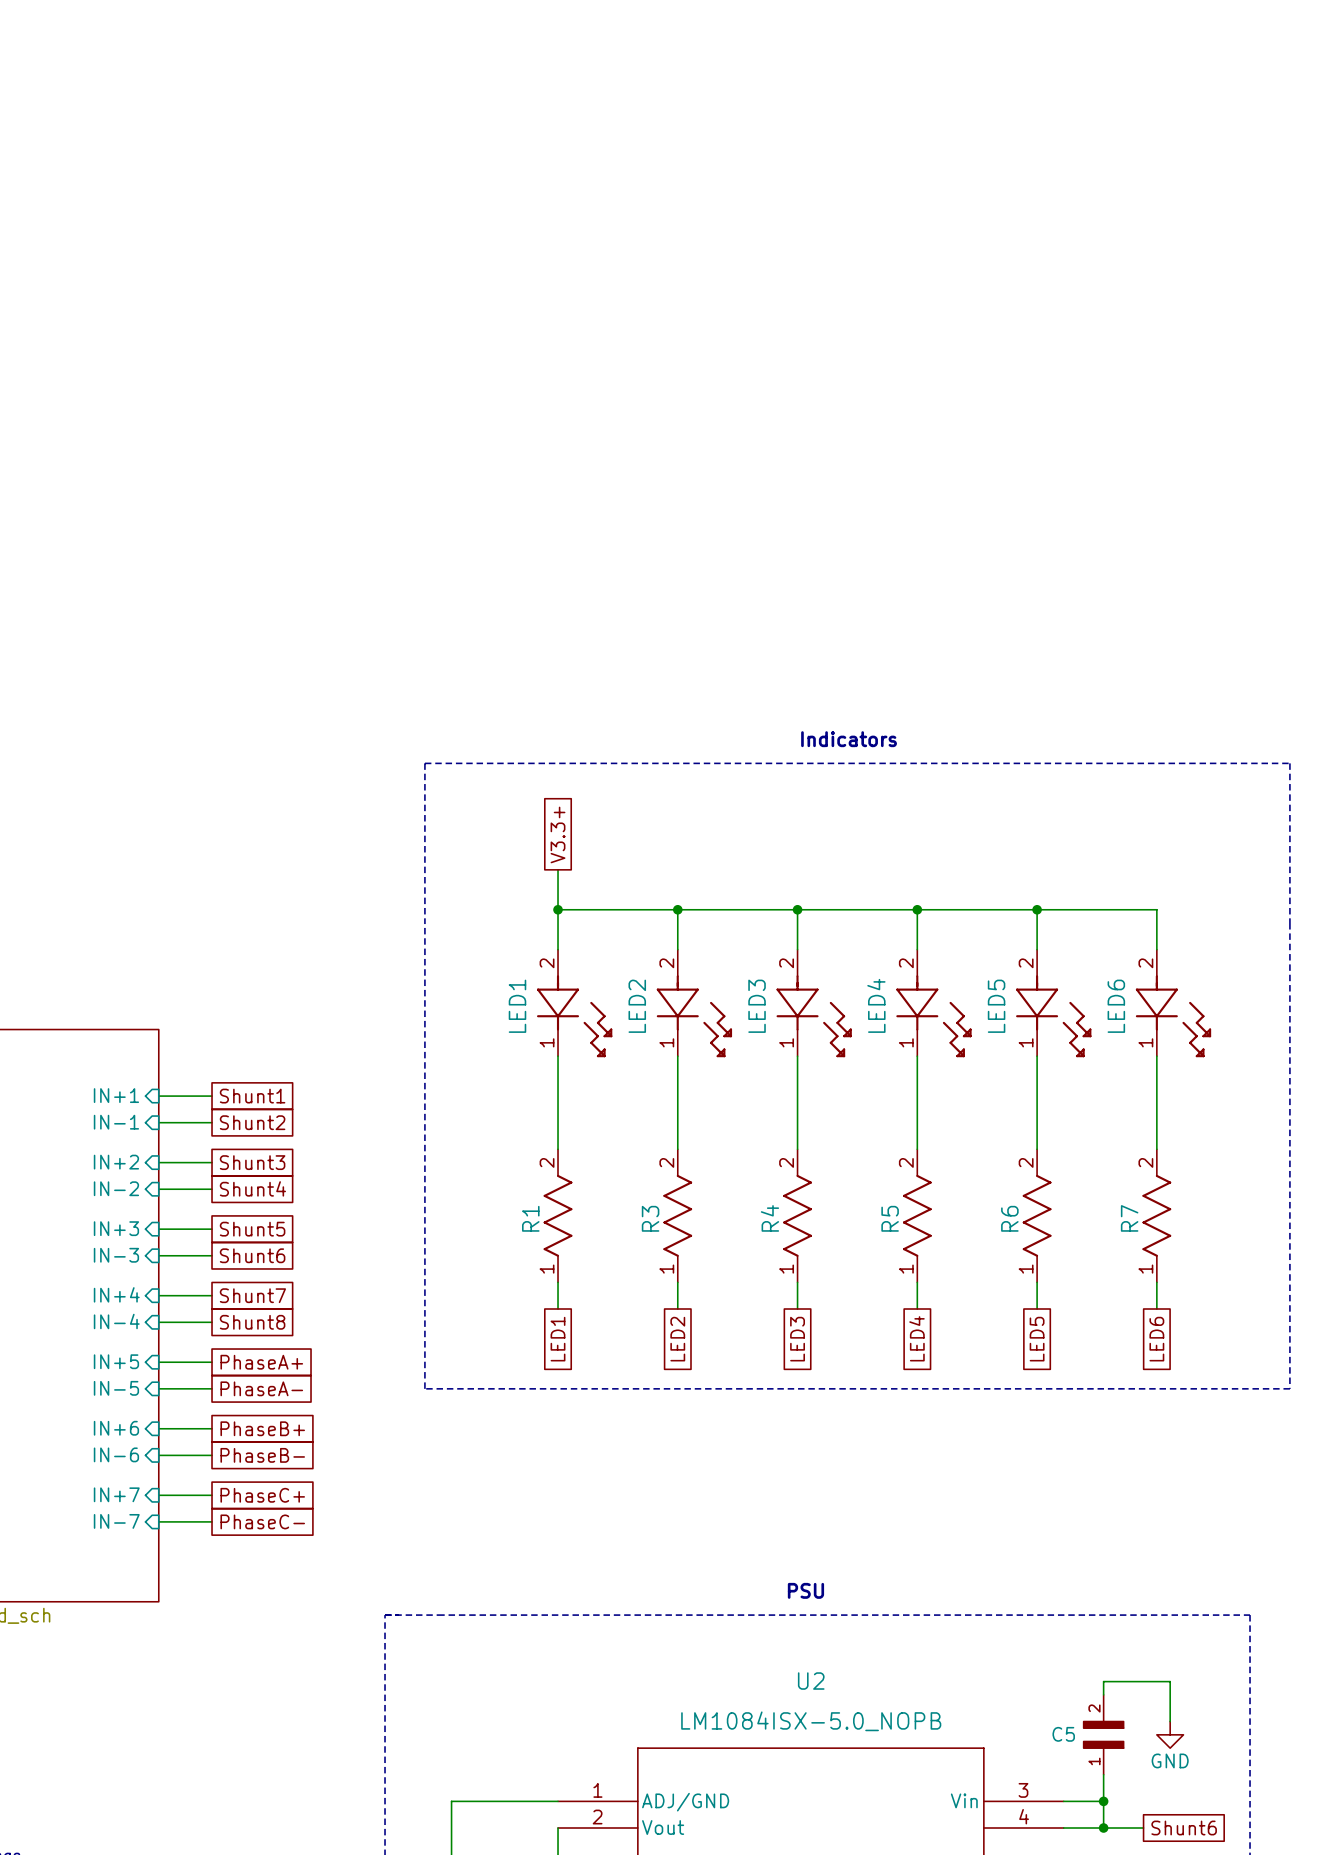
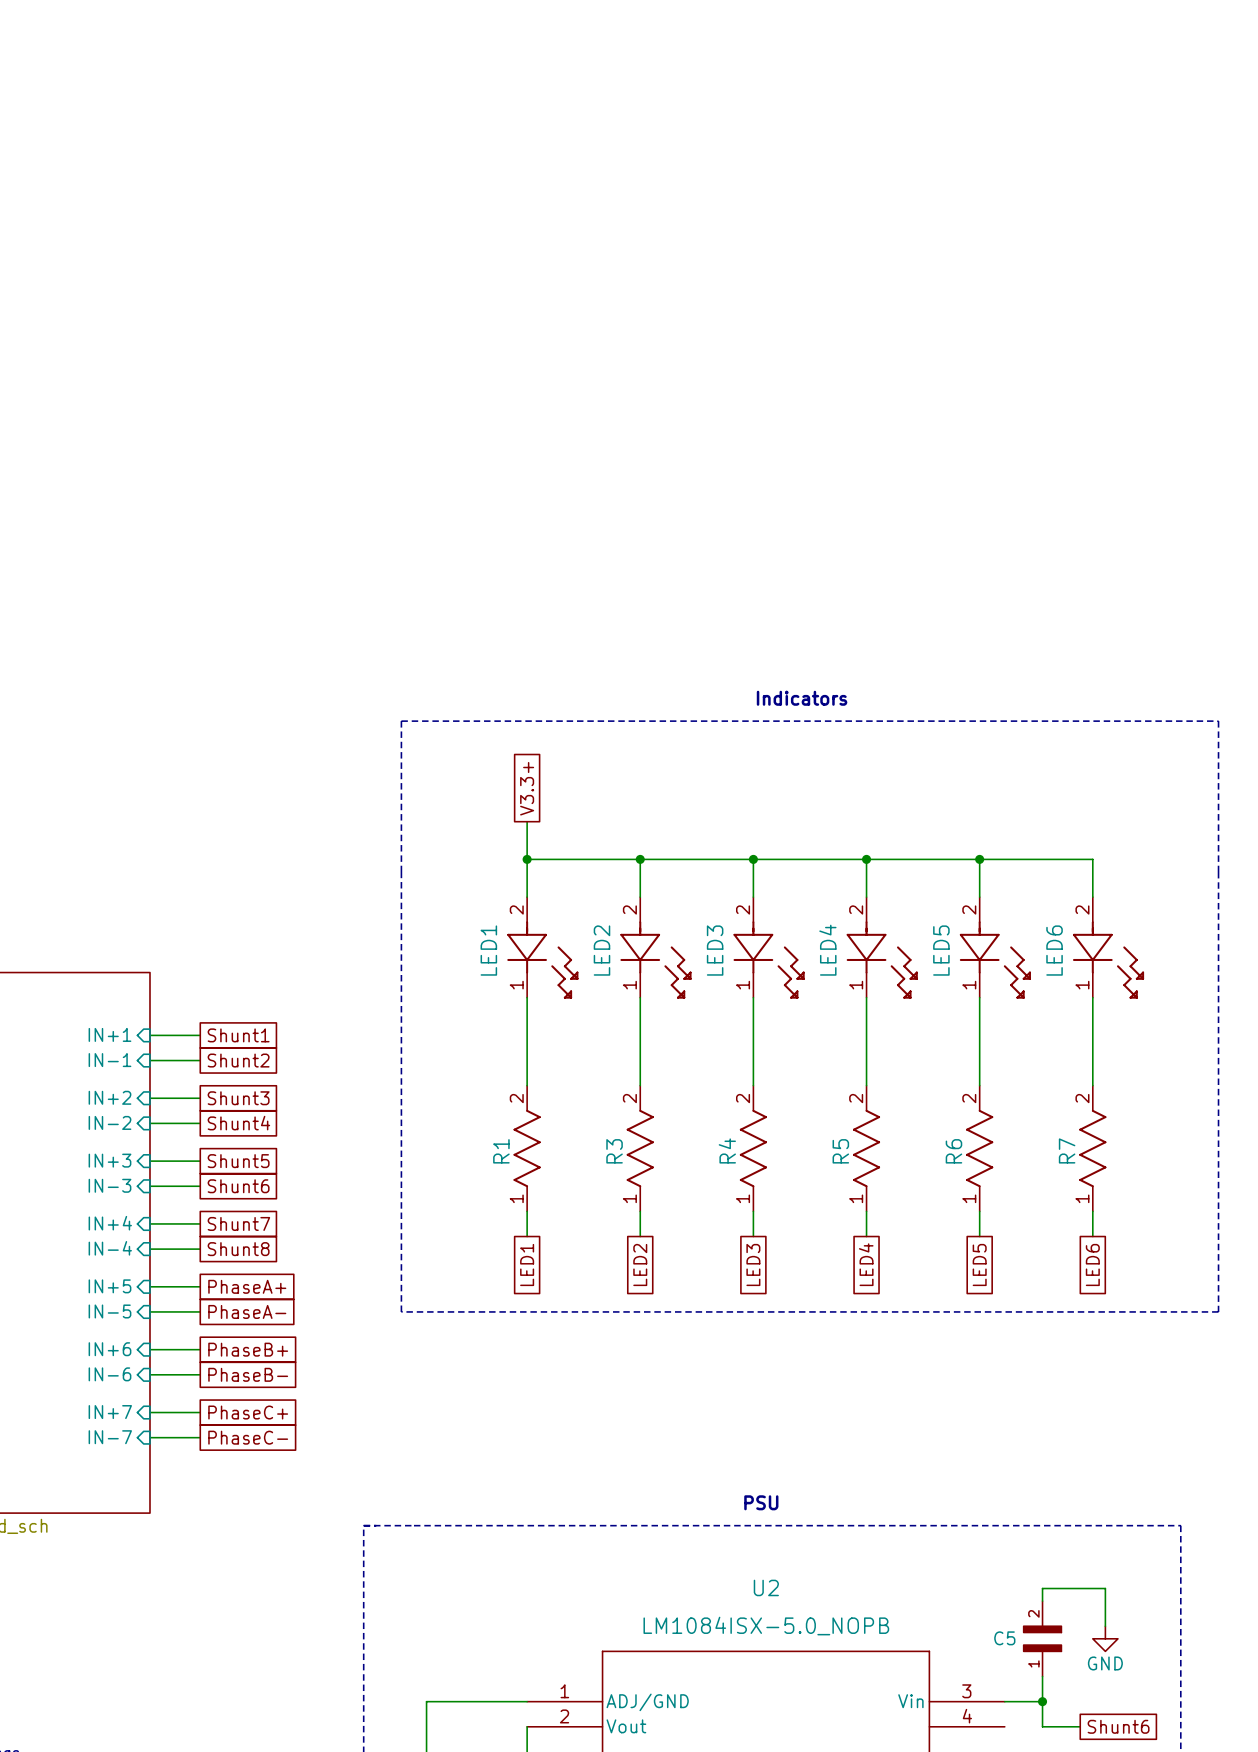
wire: (1063, 1828) (1103, 1828) -> none
junction: (1103, 1828) -> none

